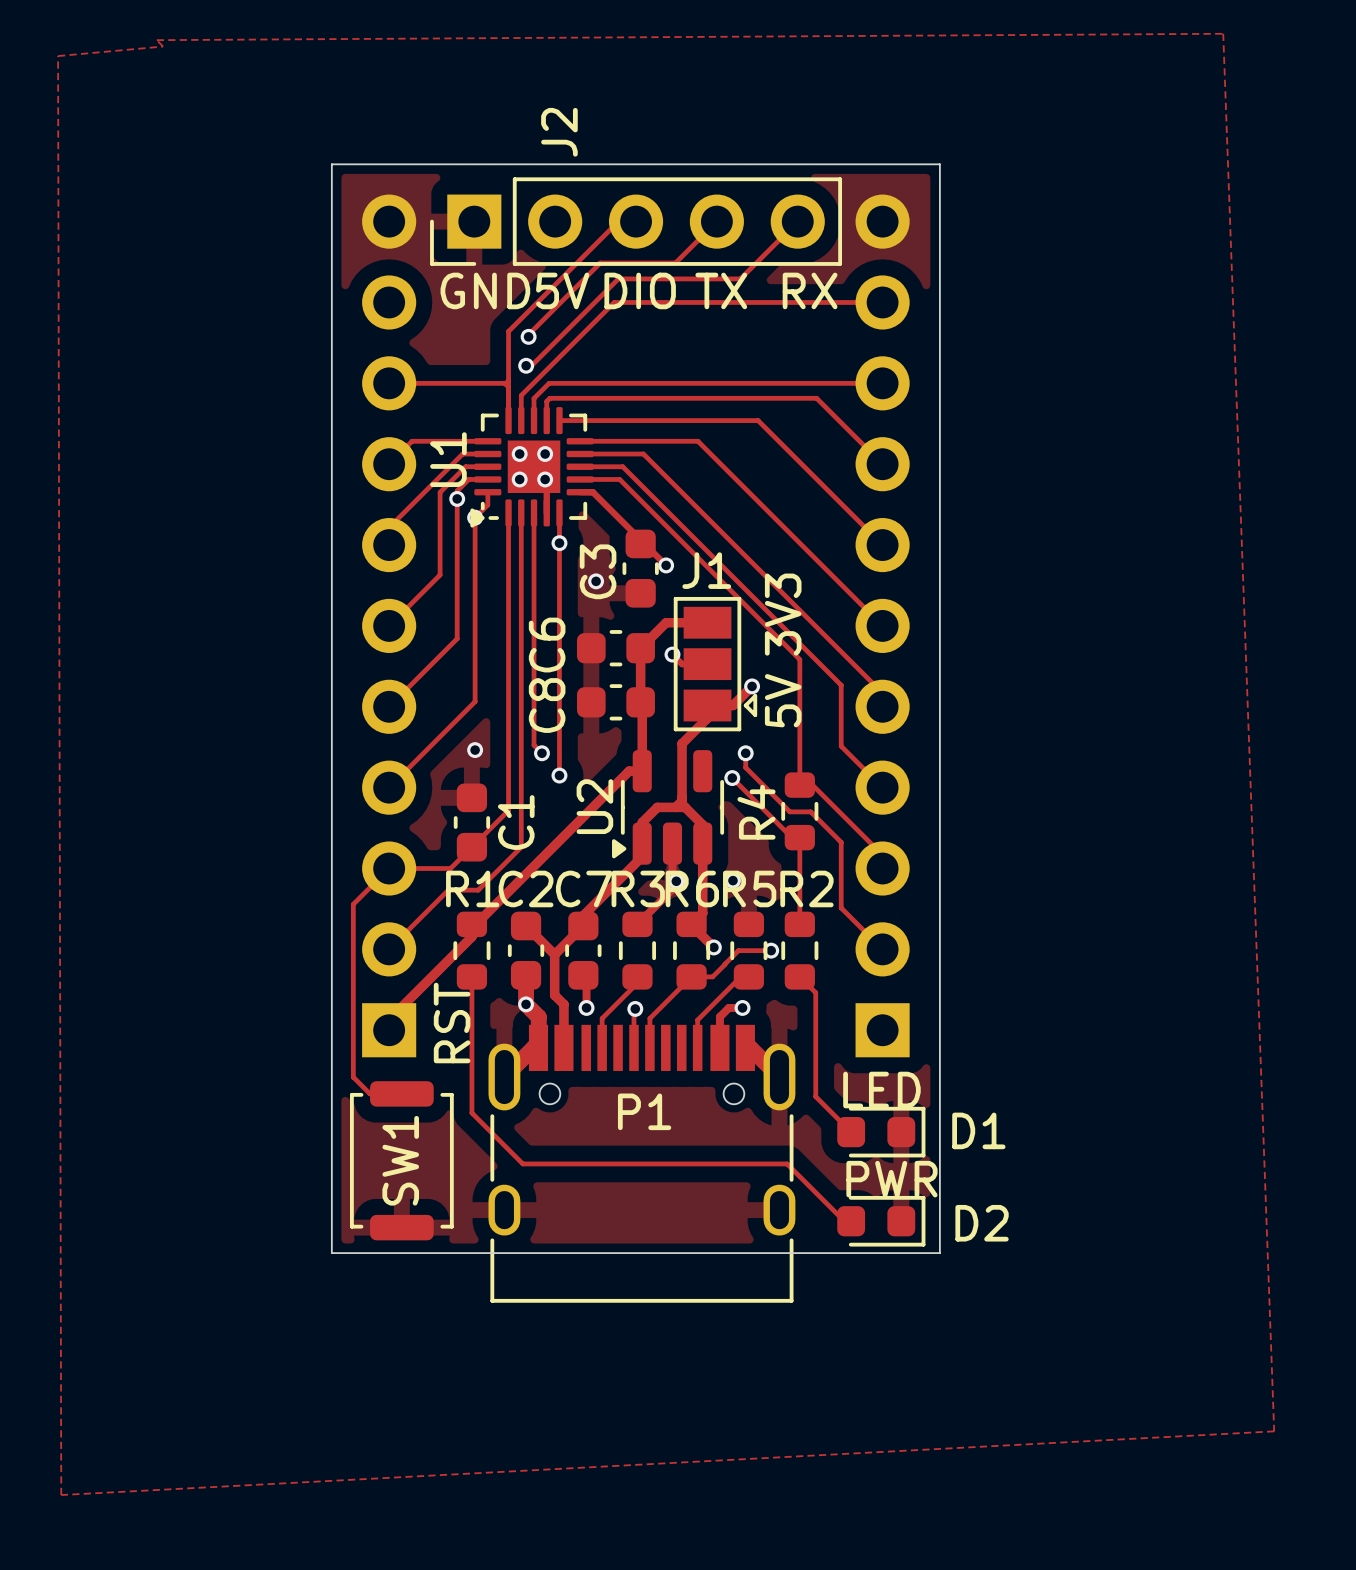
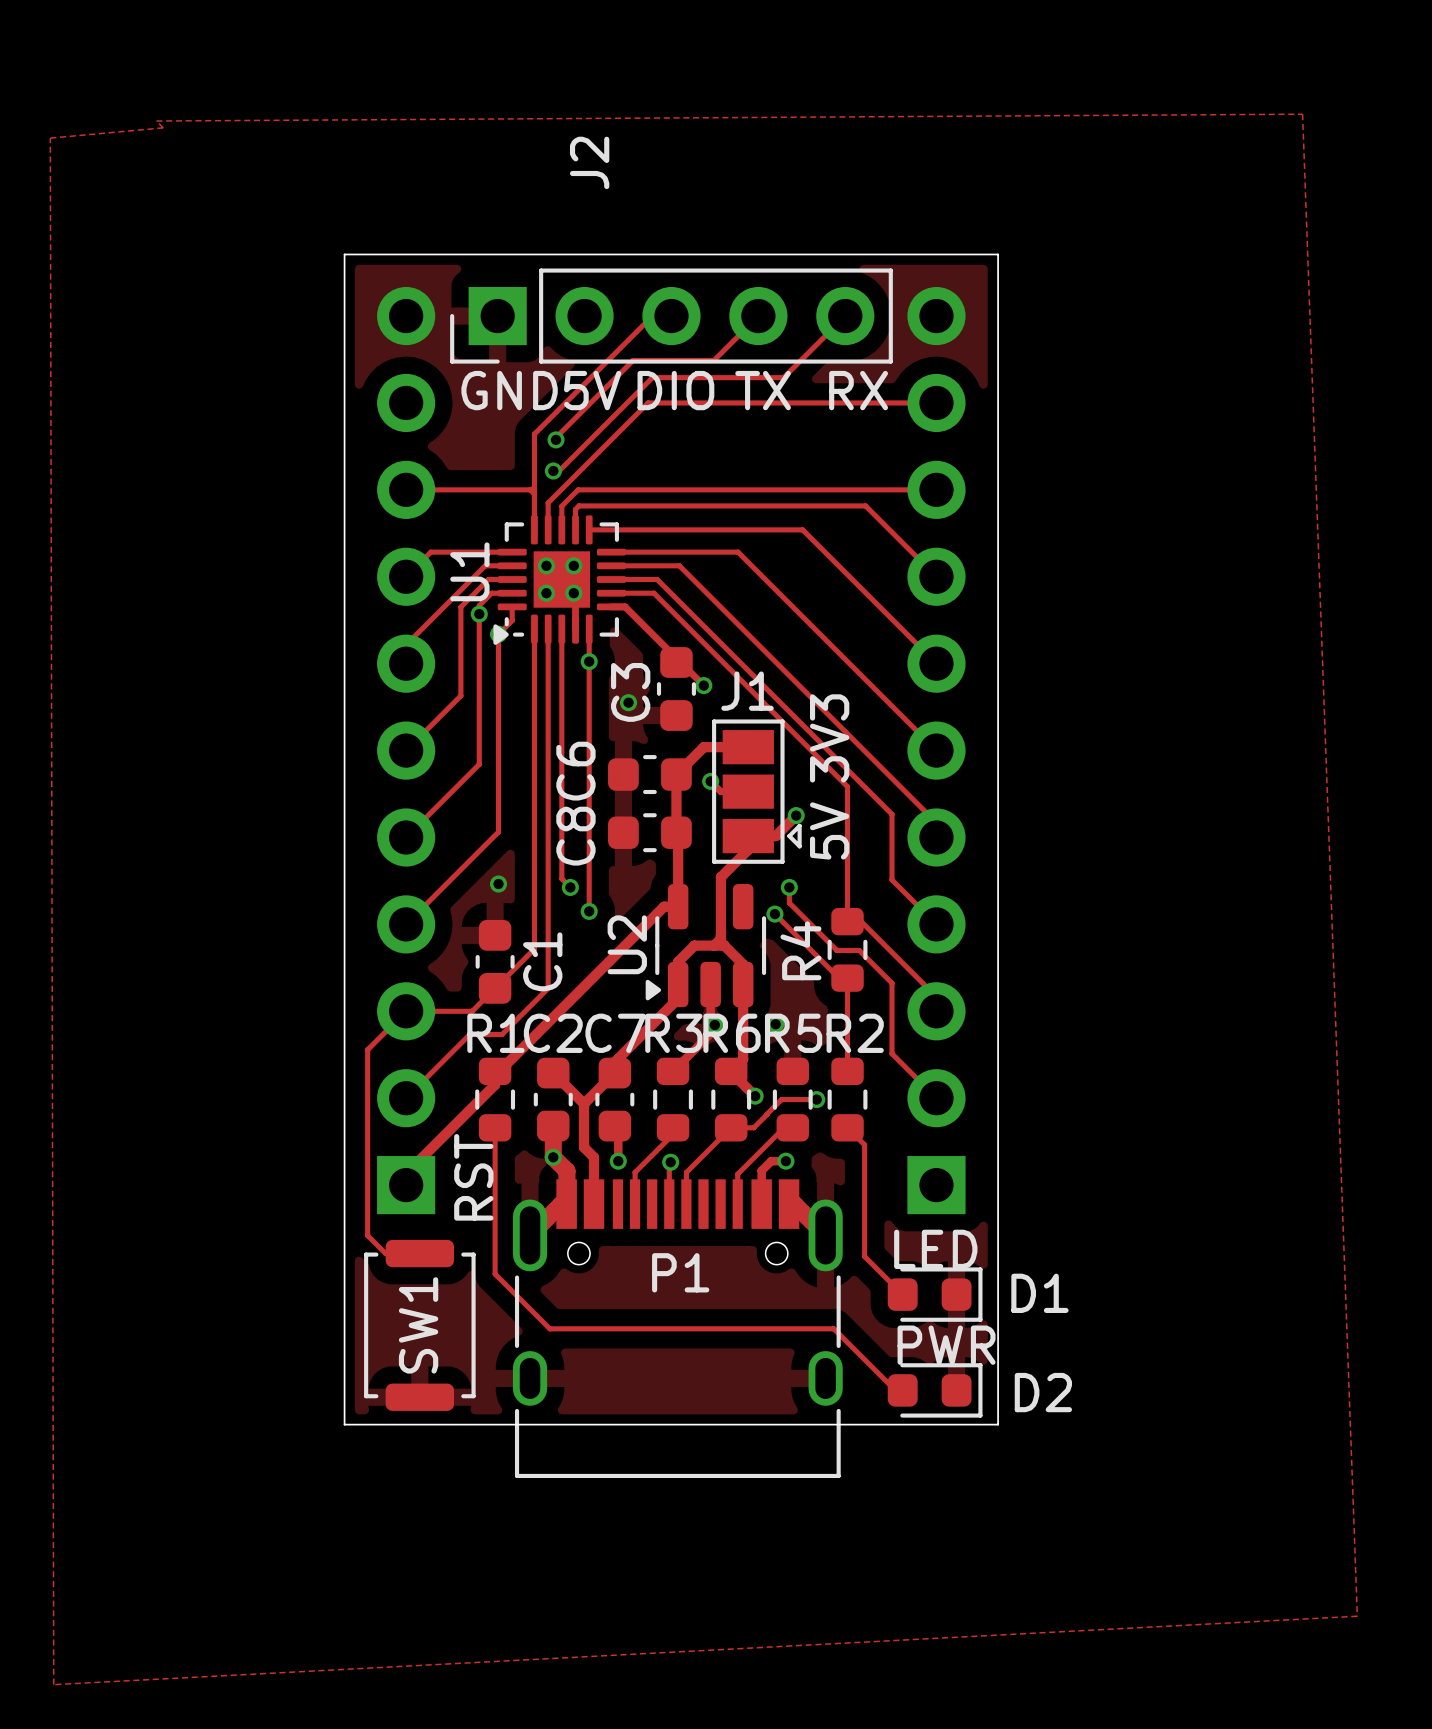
J2 name position: J2 (559, 132) -> J2 (589, 162)

